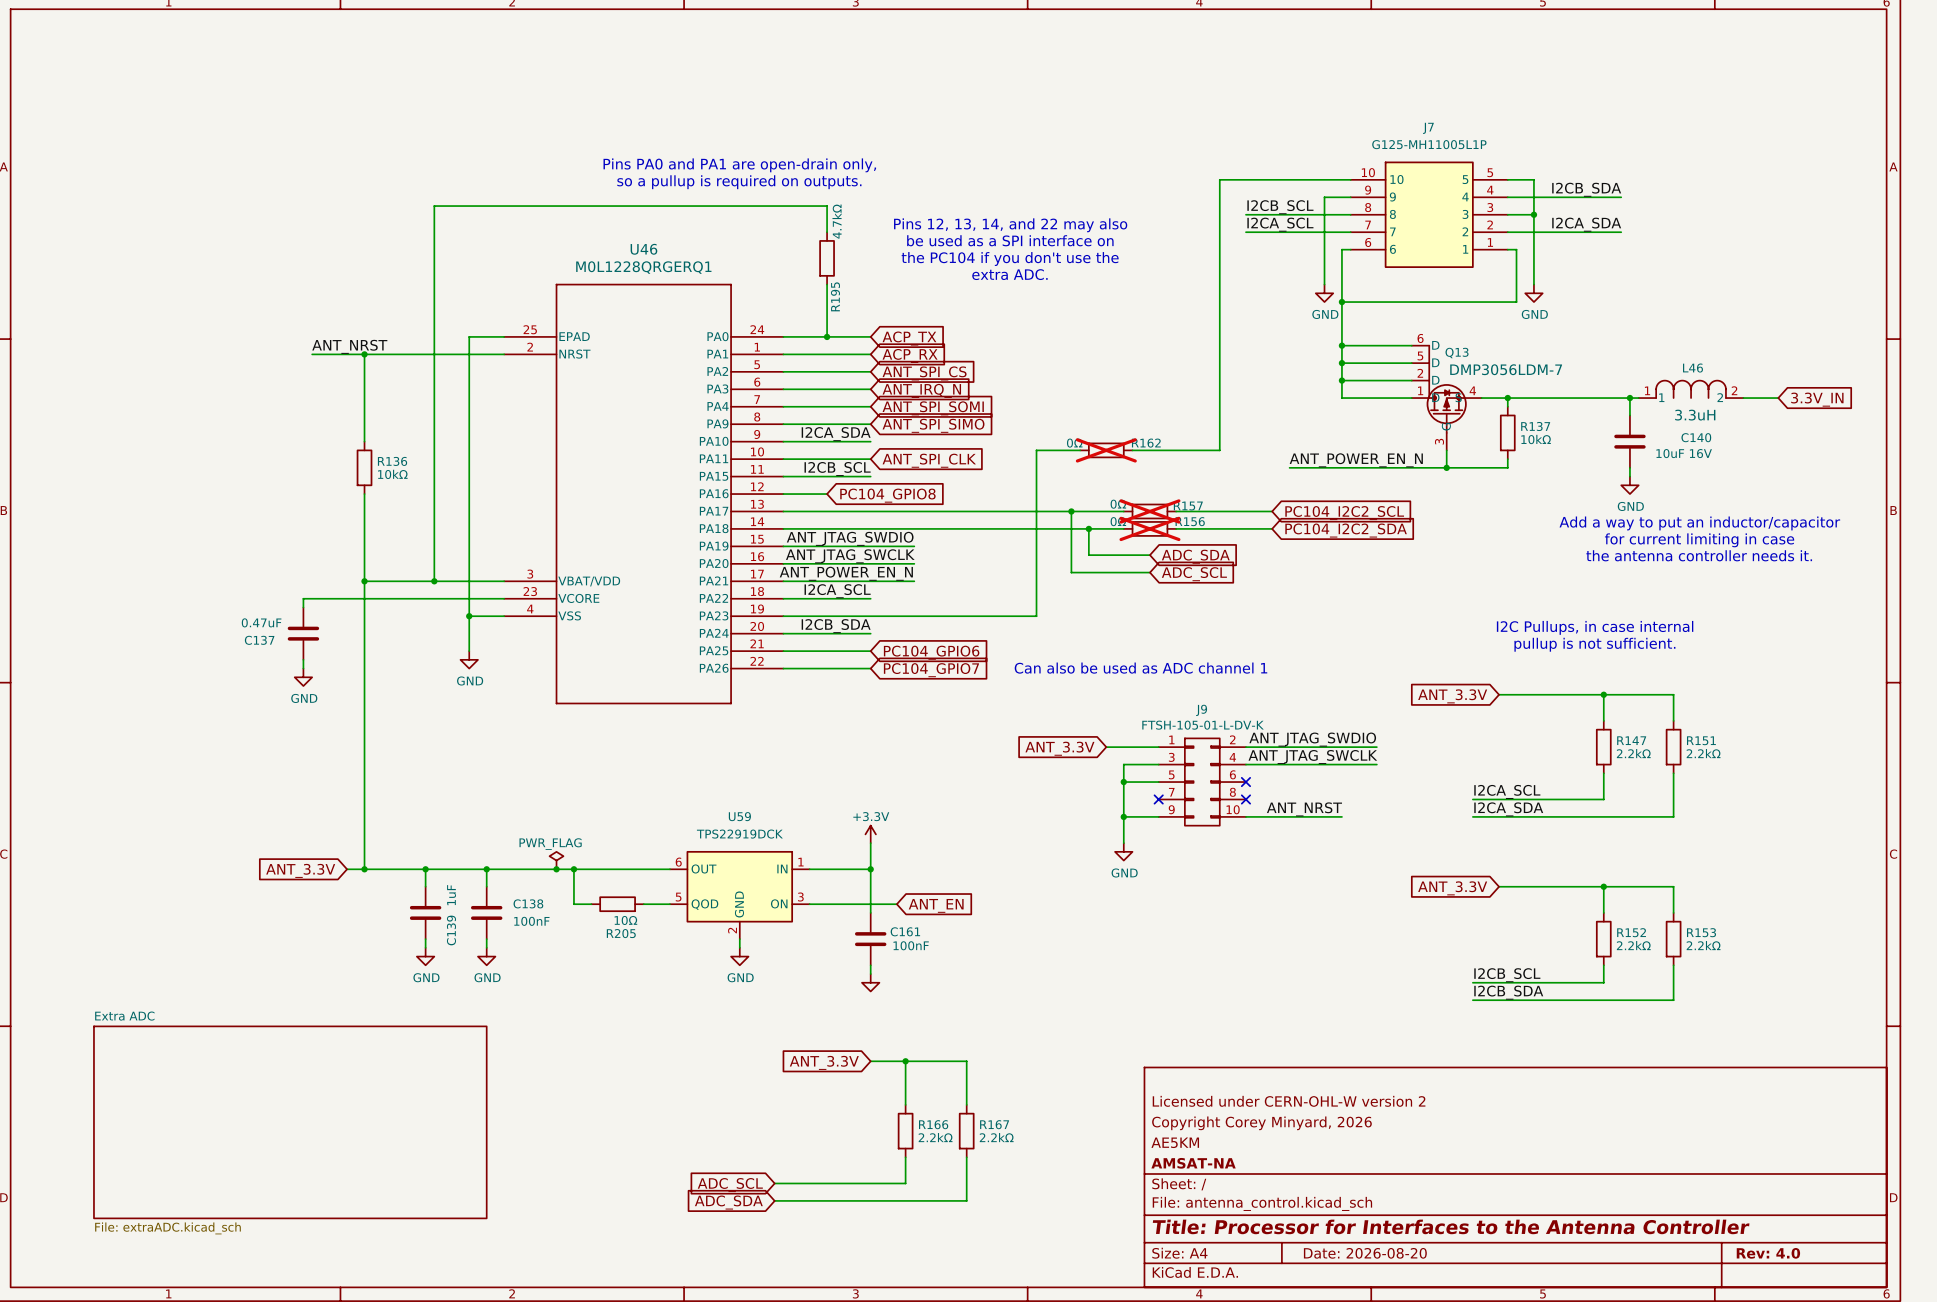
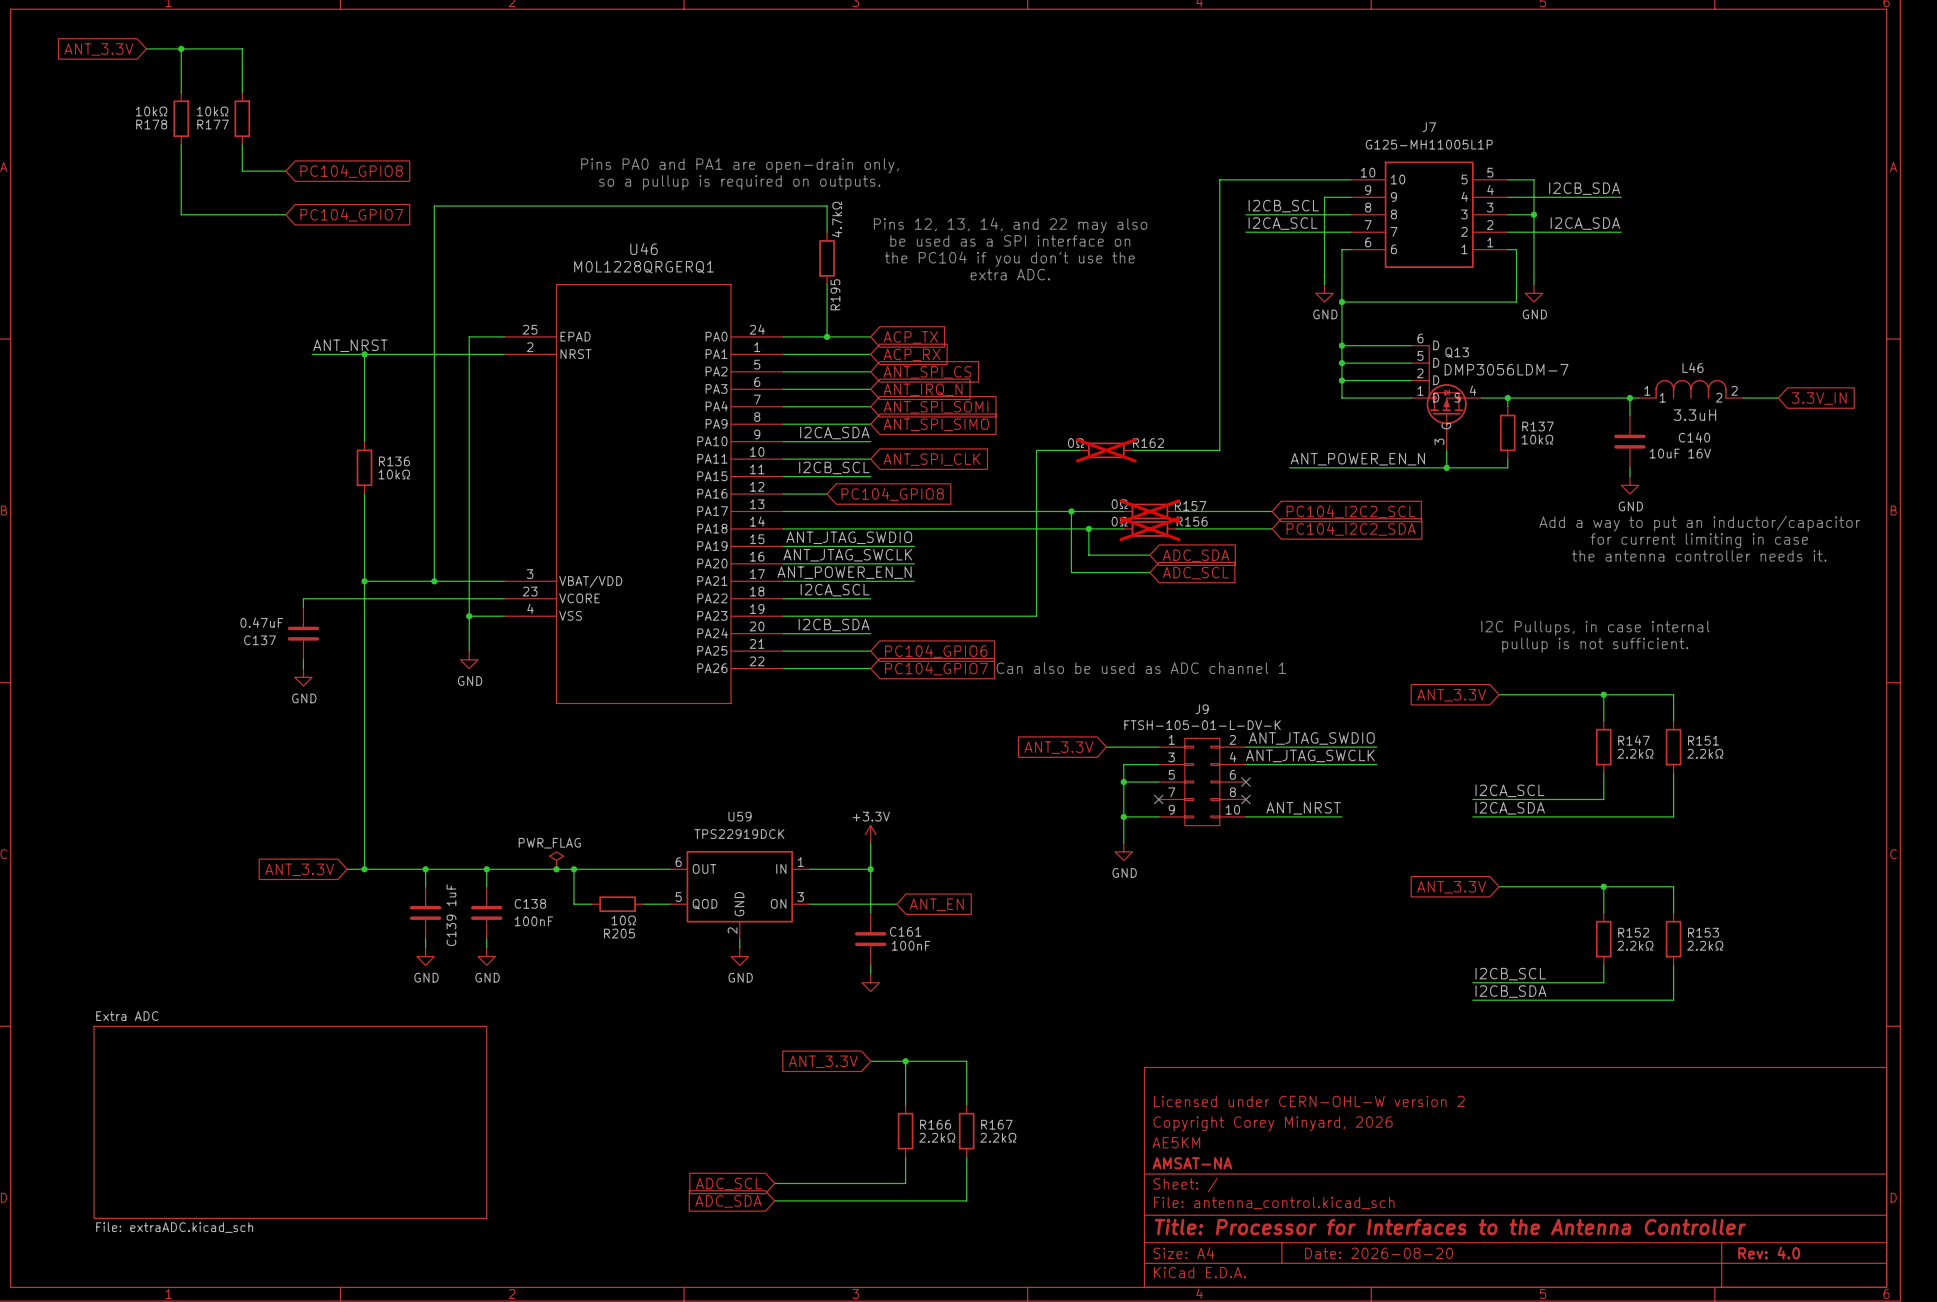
wire: none -> (146, 48) (242, 48) (242, 92)
wire: none -> (181, 48) (181, 92)
junction: none -> (181, 48)
global label: none -> ANT_3.3V (98, 49)
R178: none -> 10kΩ (181, 118)
R177: none -> 10kΩ (242, 118)
wire: none -> (181, 144) (181, 214) (285, 214)
wire: none -> (242, 144) (242, 171) (285, 171)
global label: none -> PC104_GPIO8 (351, 171)
global label: none -> PC104_GPIO7 (351, 215)

